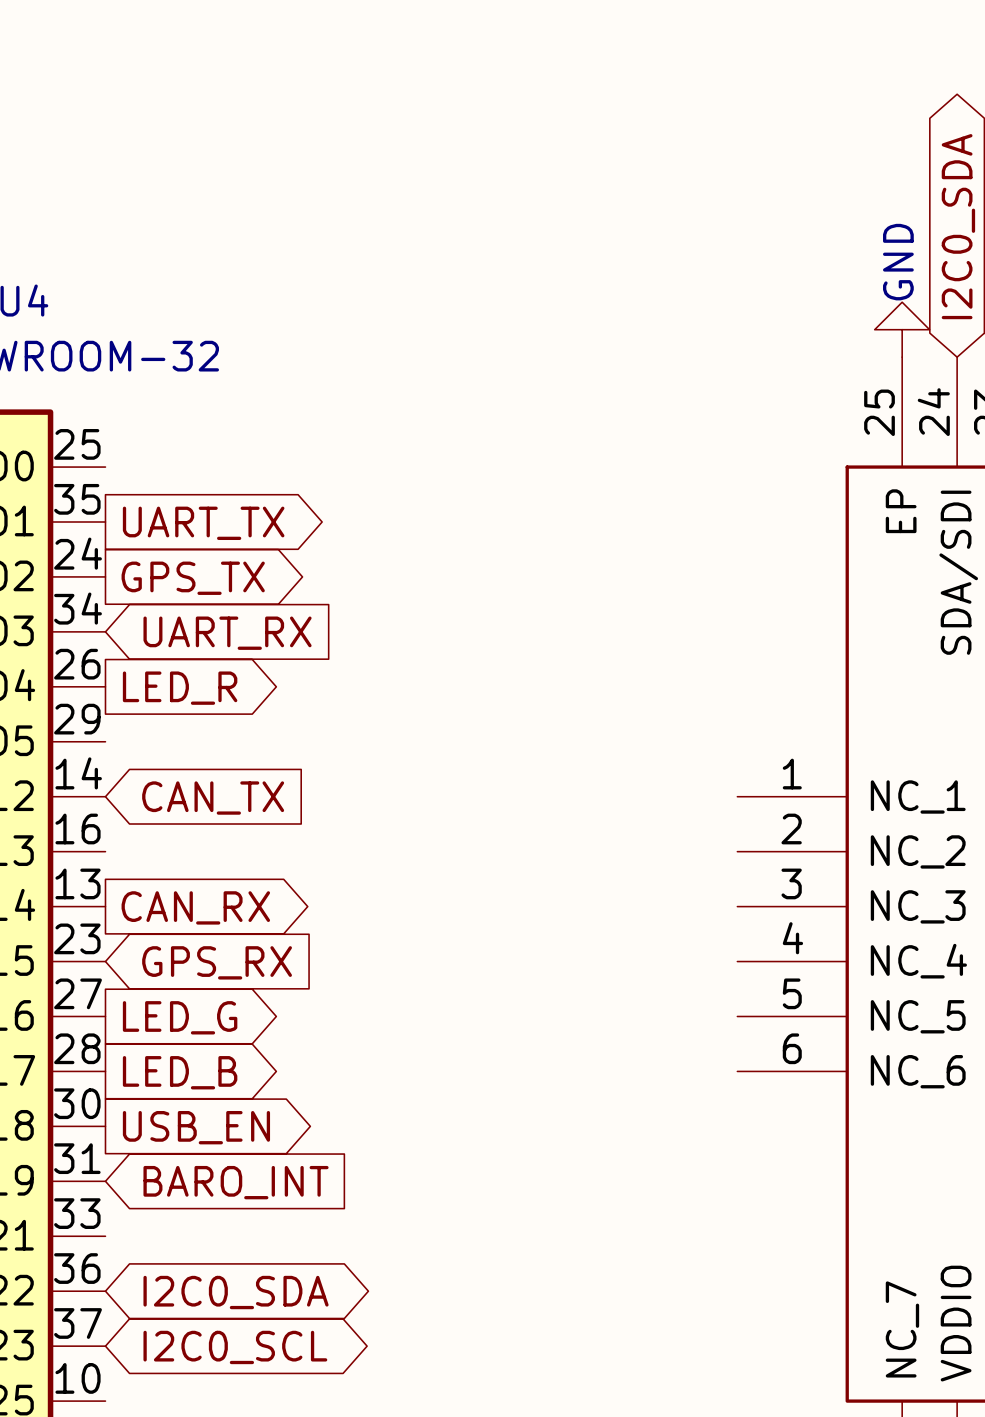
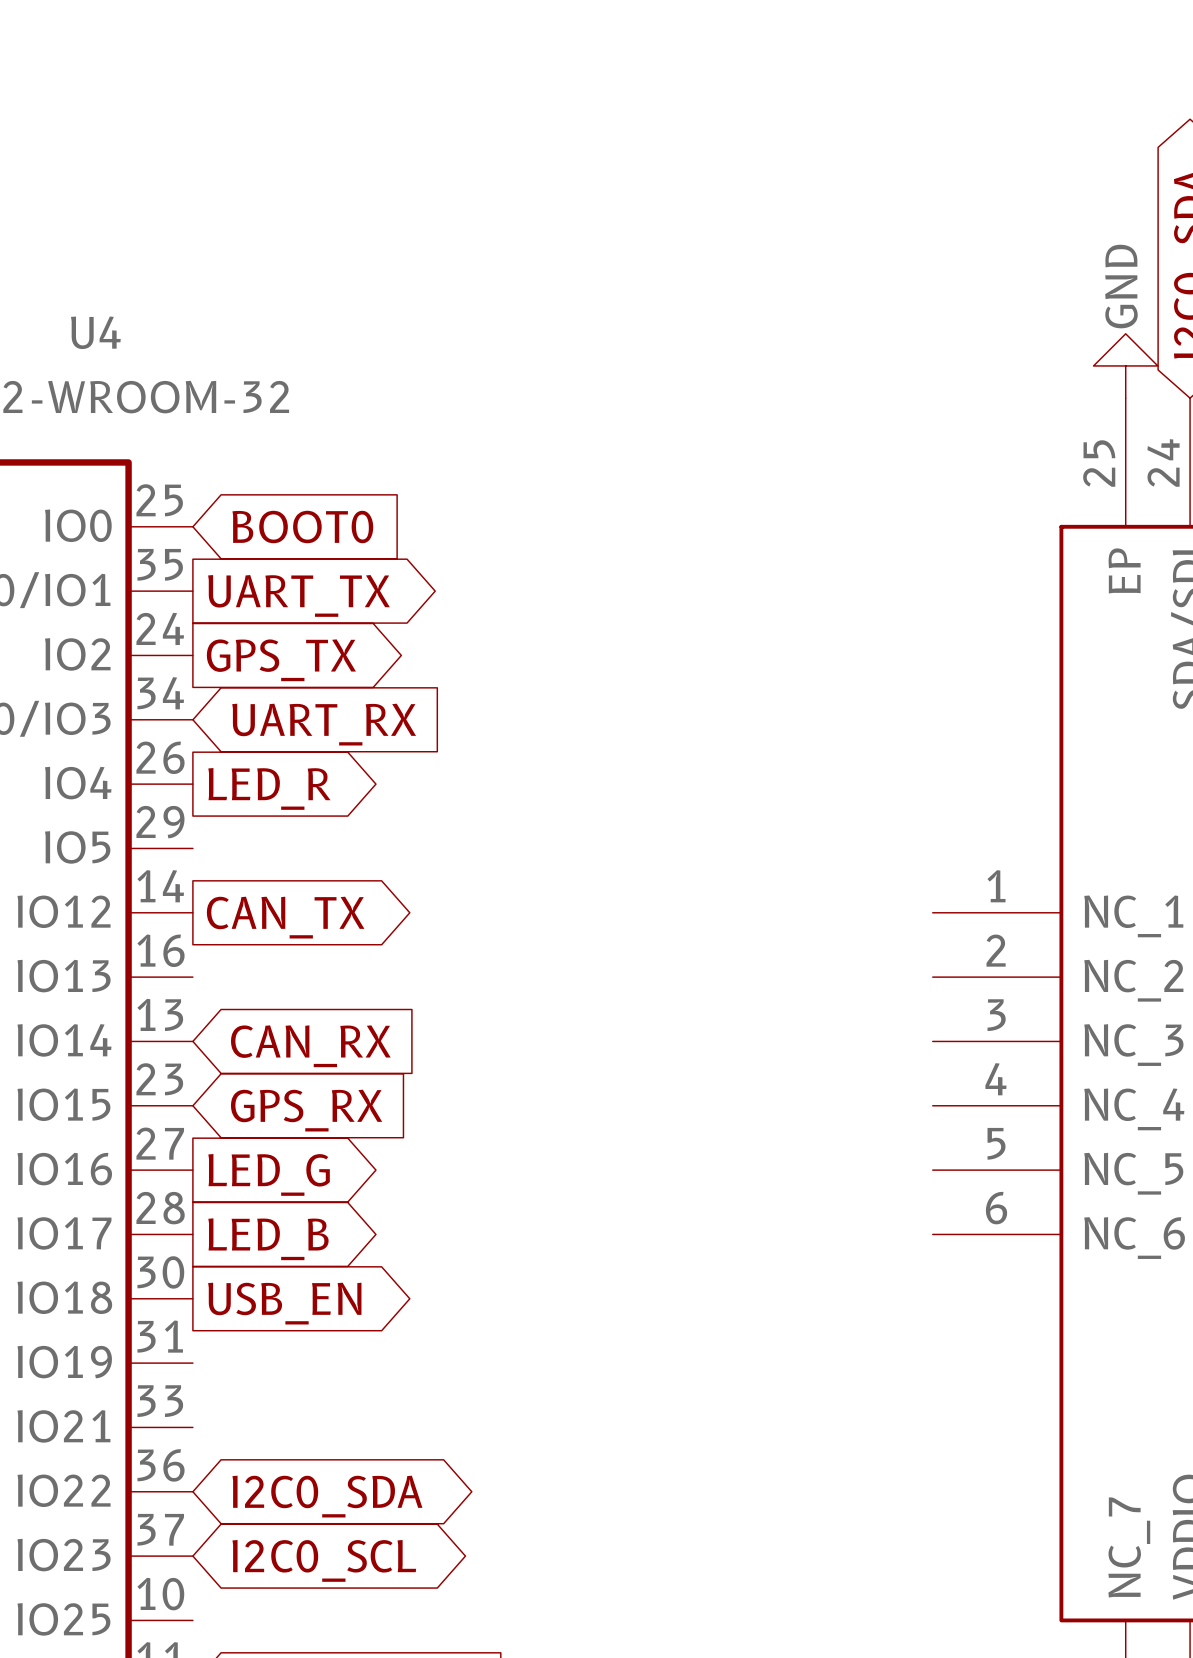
global label: none -> BOOT0 (302, 527)
global label shape: input (213, 798) -> output (285, 917)
global label shape: output (195, 907) -> input (310, 1046)
global label: BARO_INT (236, 1182) -> none

